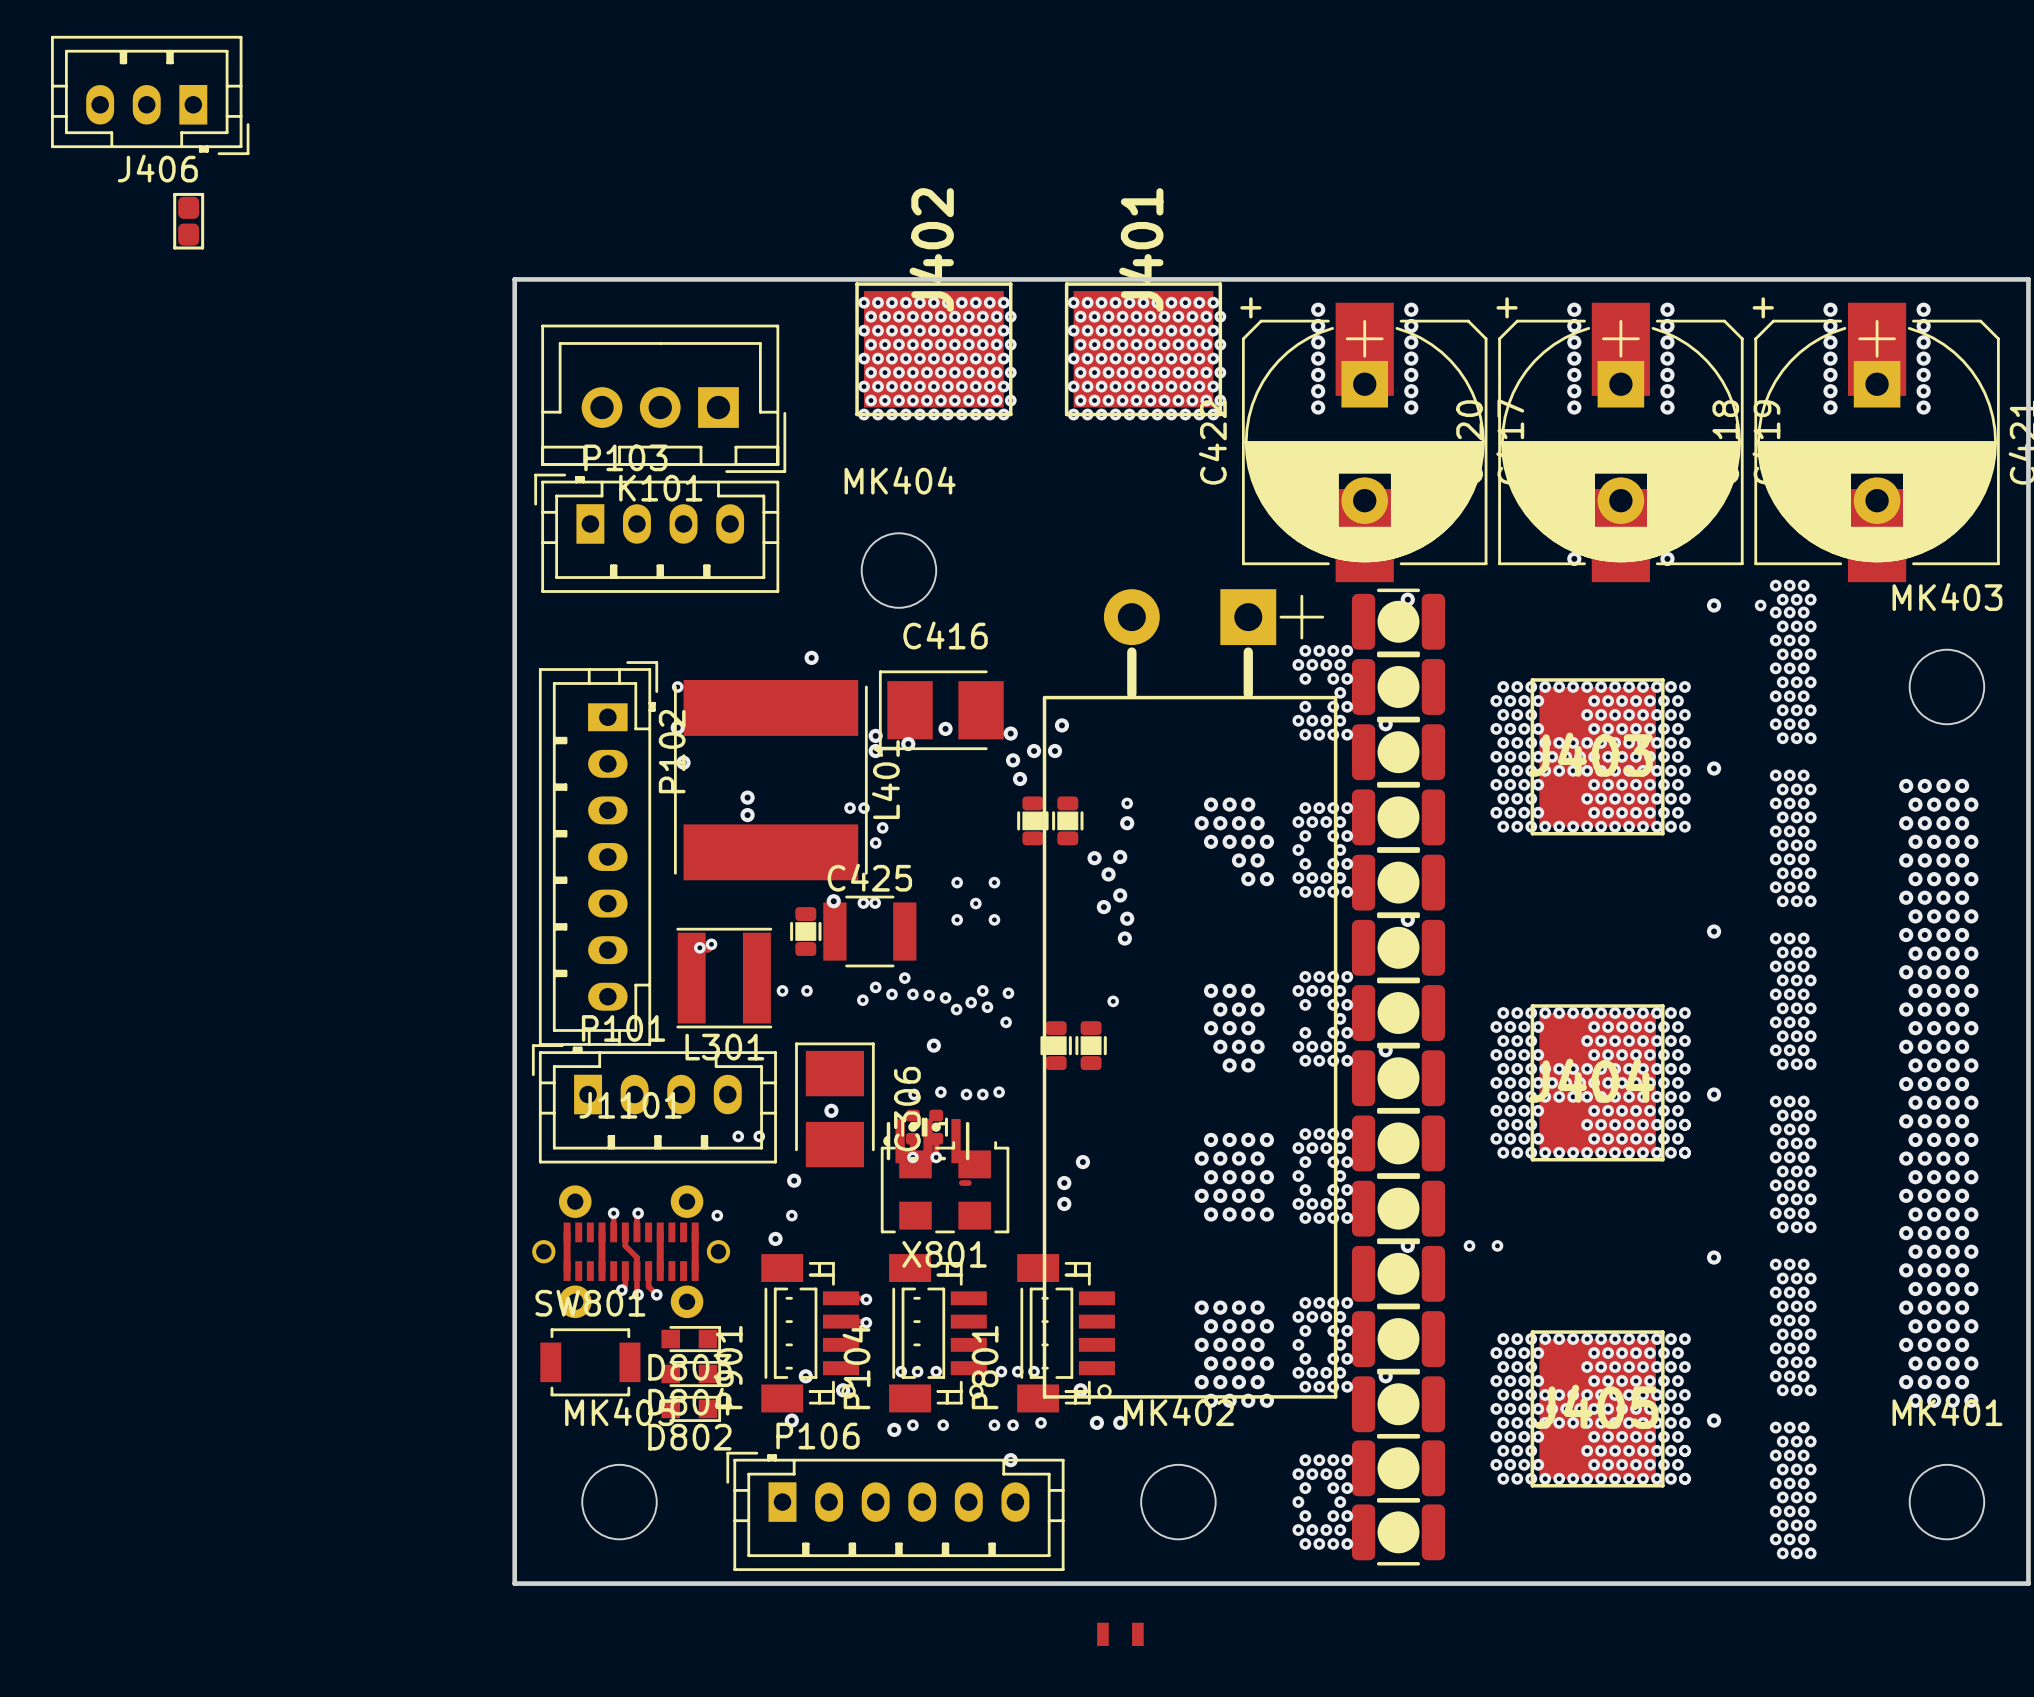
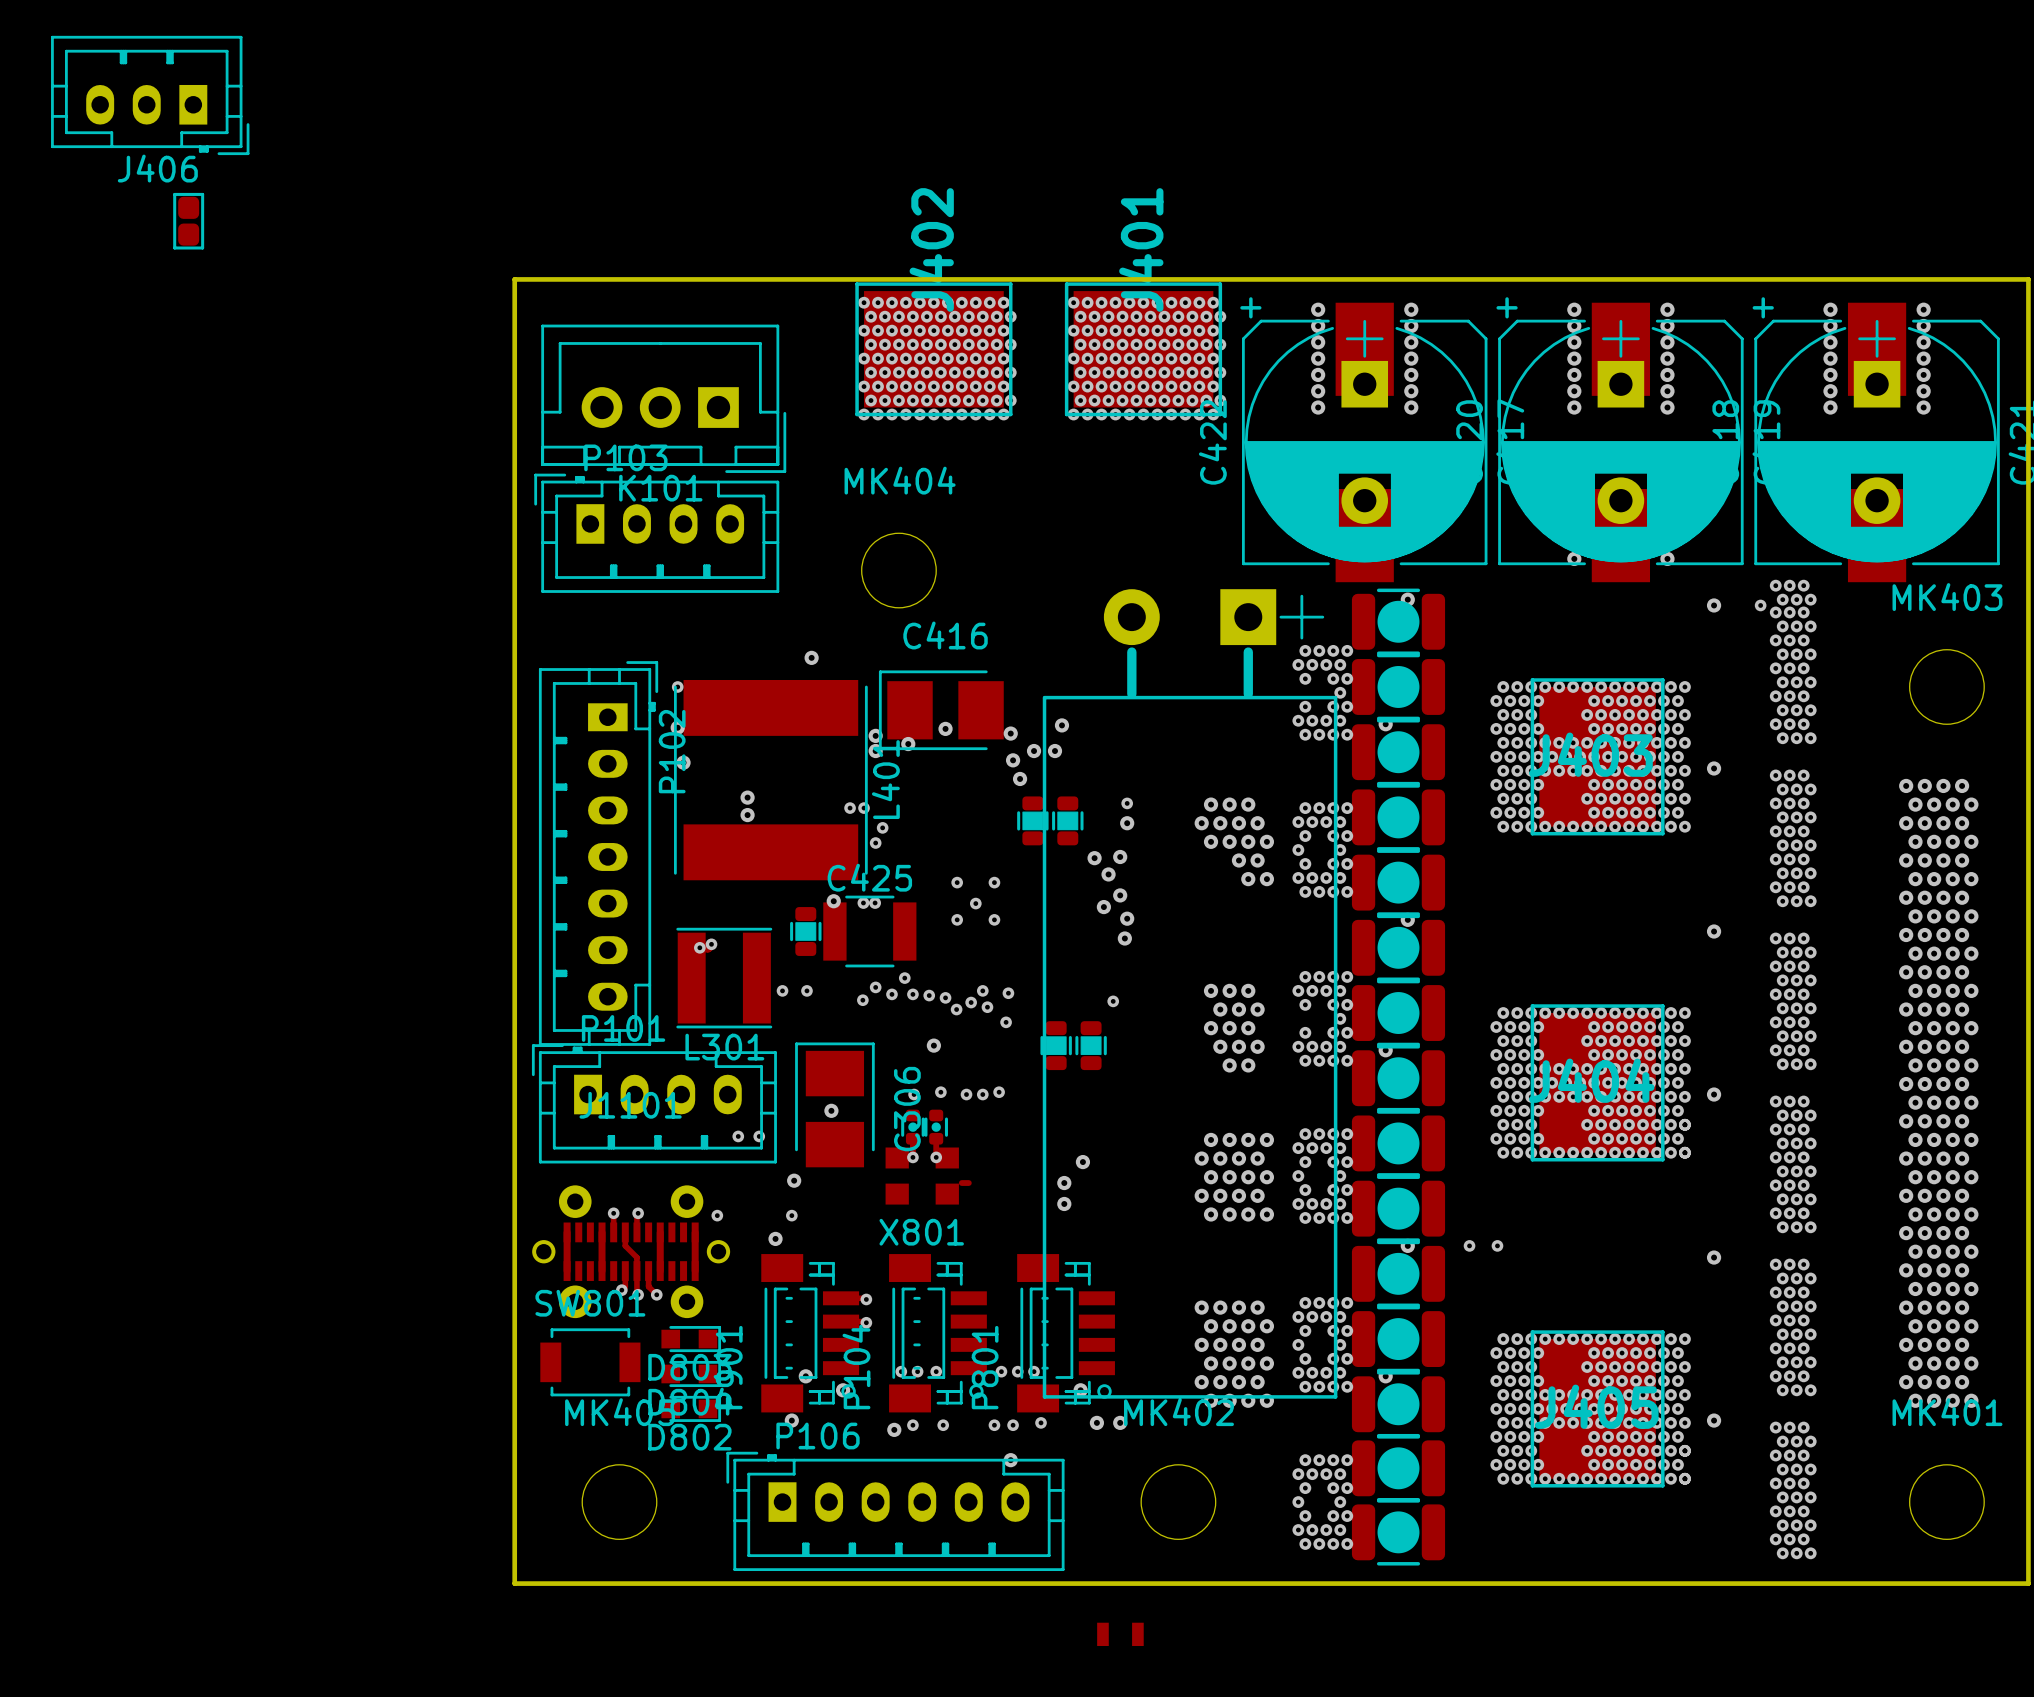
X801 footprint: [880, 1141, 1010, 1234] -> [885, 1147, 959, 1205]
part: (926, 1141) -> none

